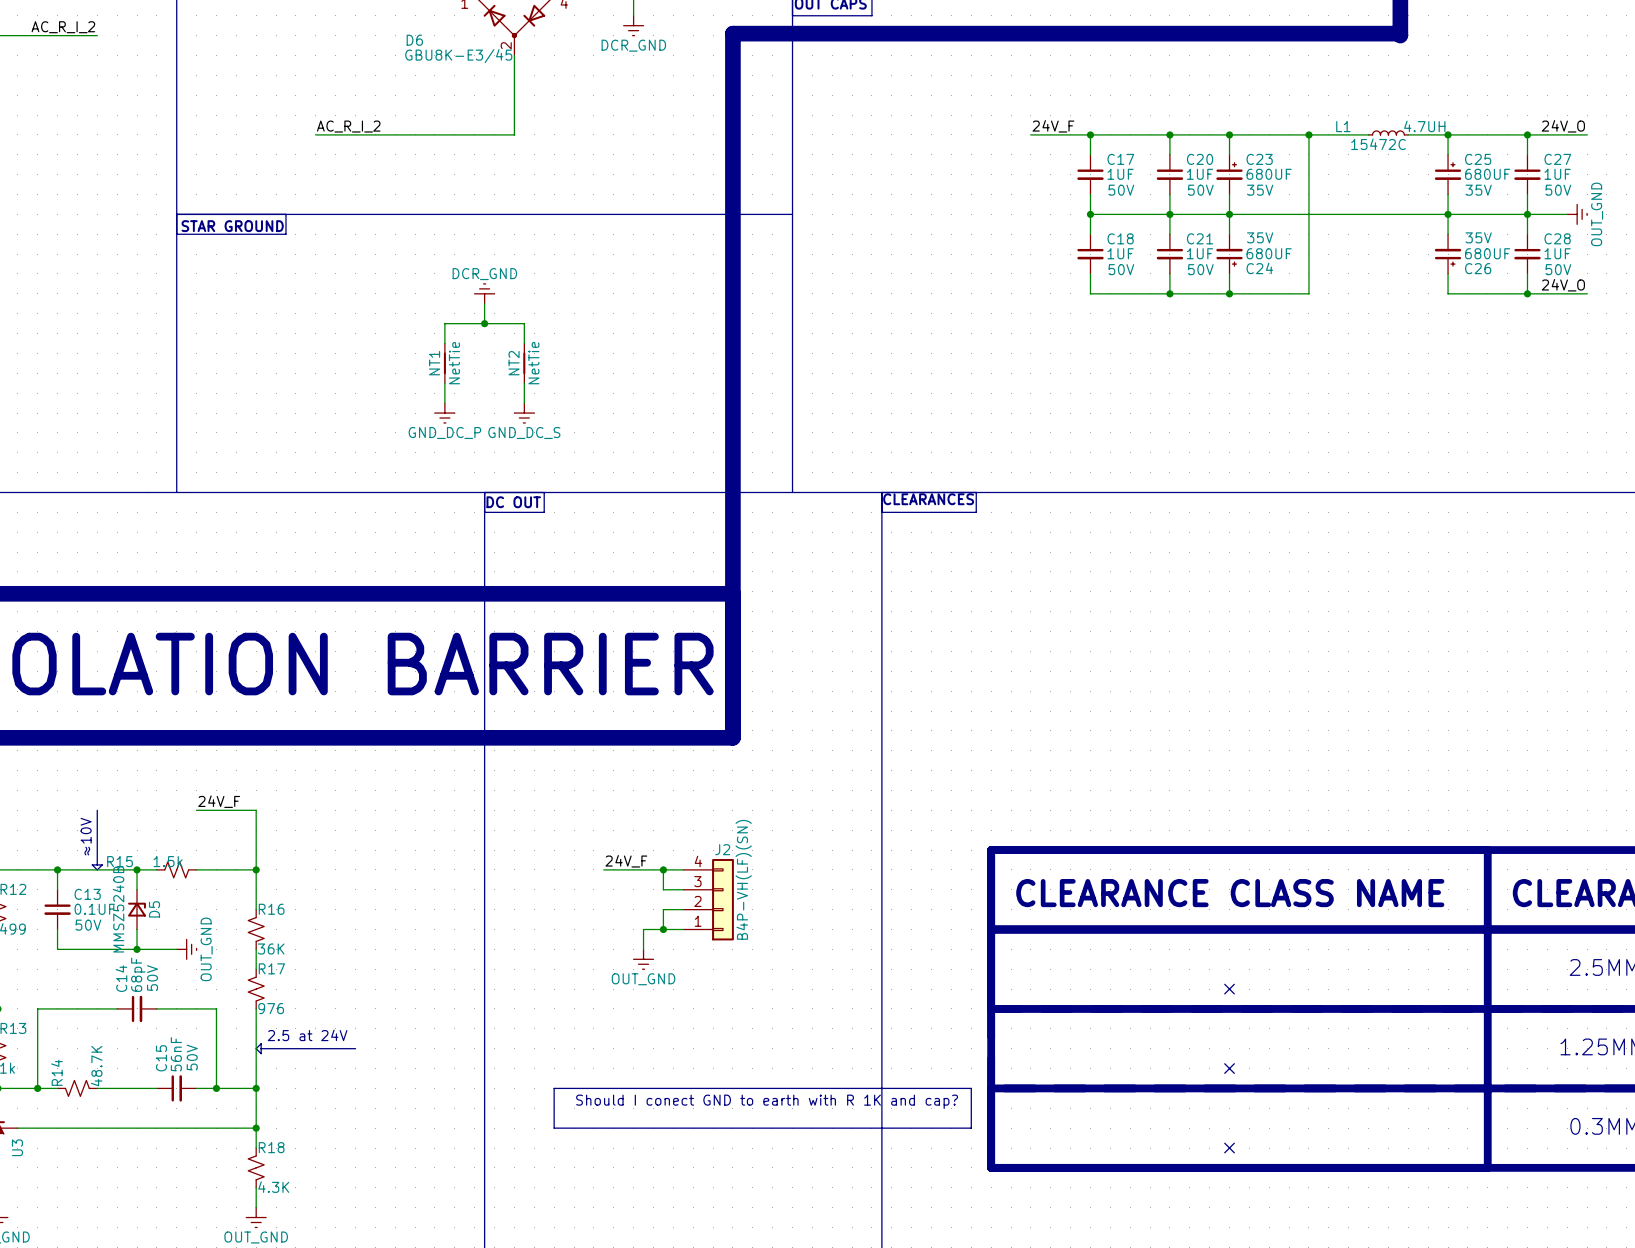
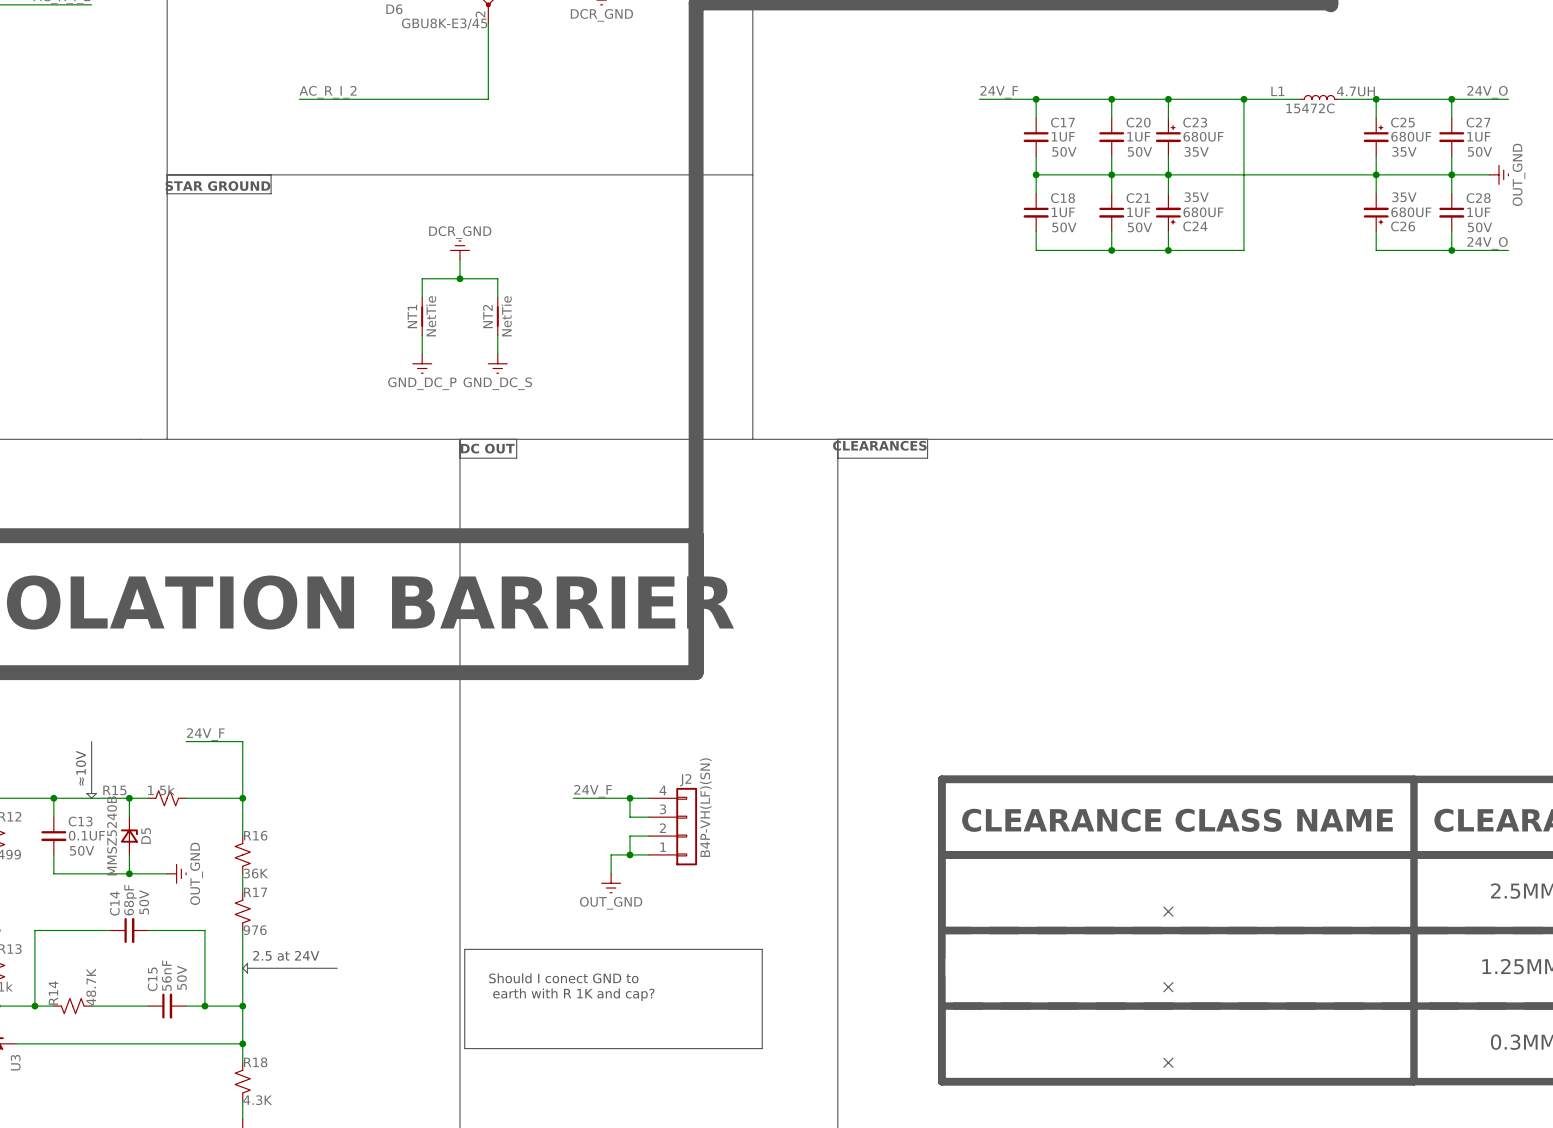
line: none -> (464, 949) (762, 949) (762, 1048) (464, 1048) (464, 949)
text: none -> Should I conect GND to (563, 978)
text: none -> earth with R 1K and cap? (573, 994)
line: (554, 1088) (971, 1088) (971, 1128) (554, 1128) (554, 1088) -> none
text: Should I conect GND to earth with R 1K and cap? (767, 1101) -> none

